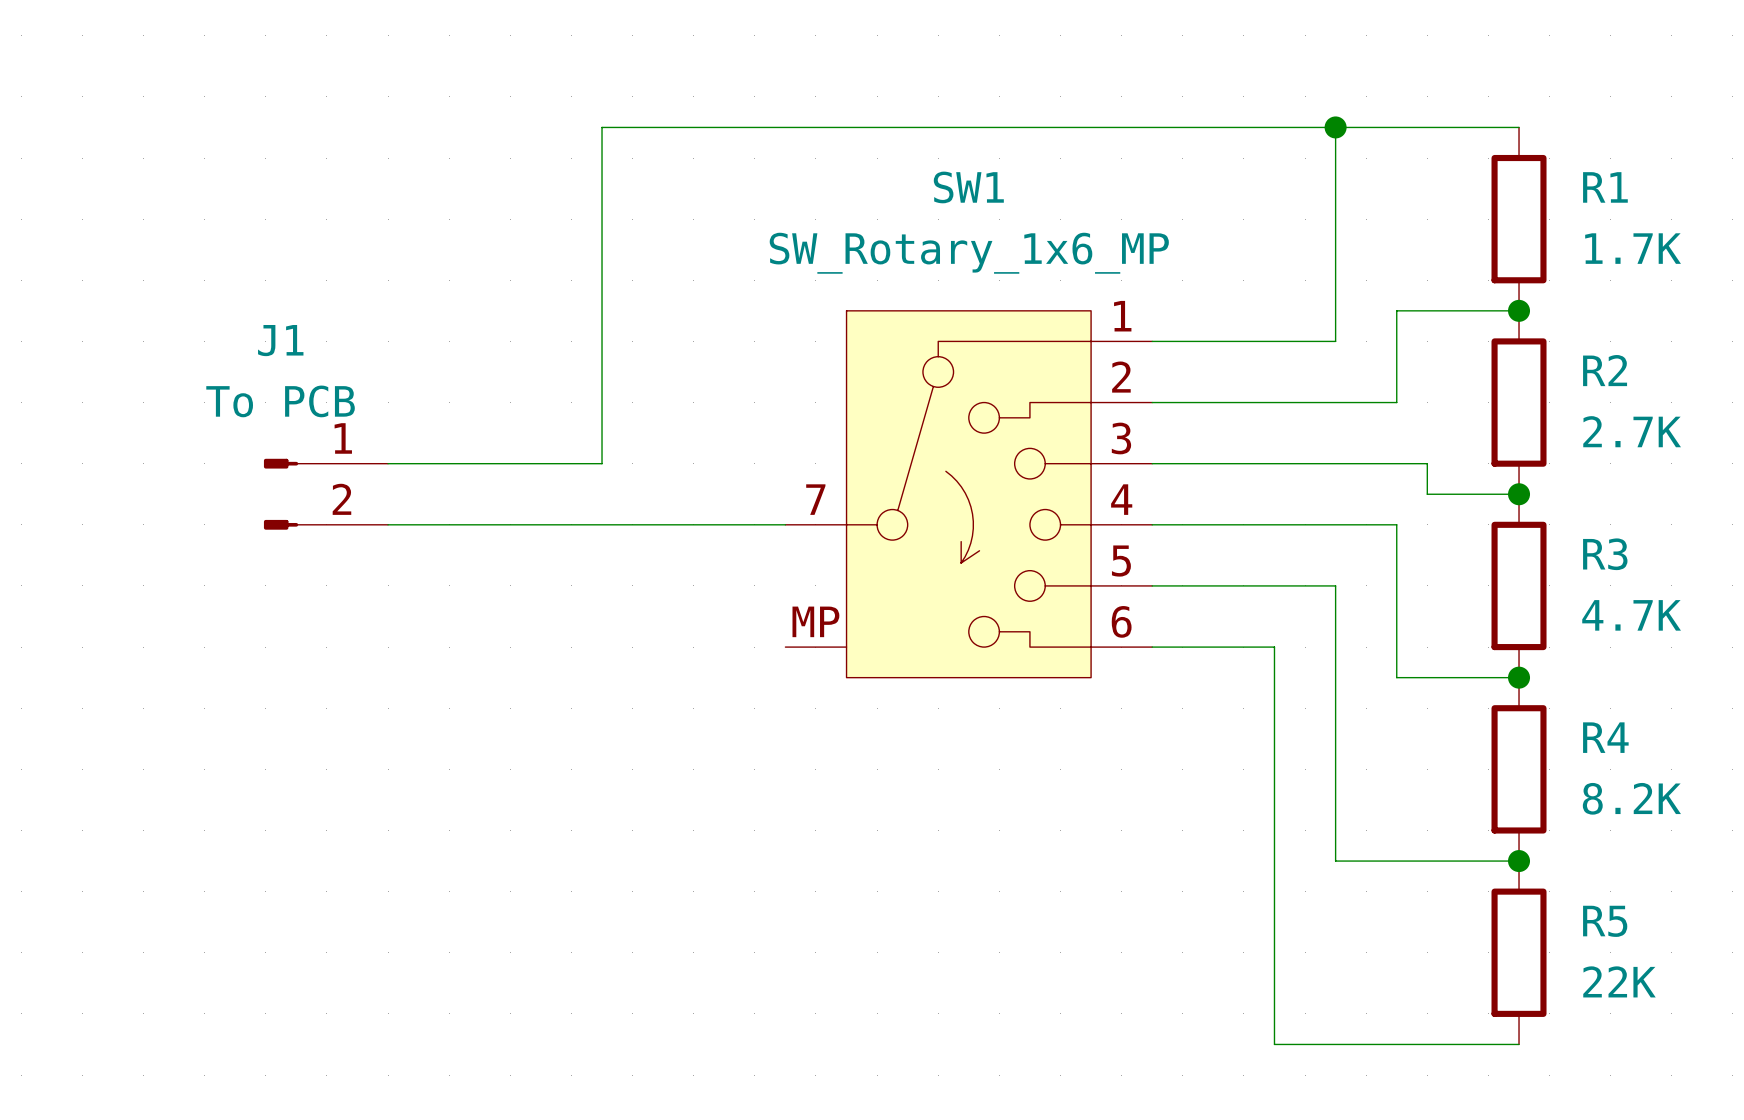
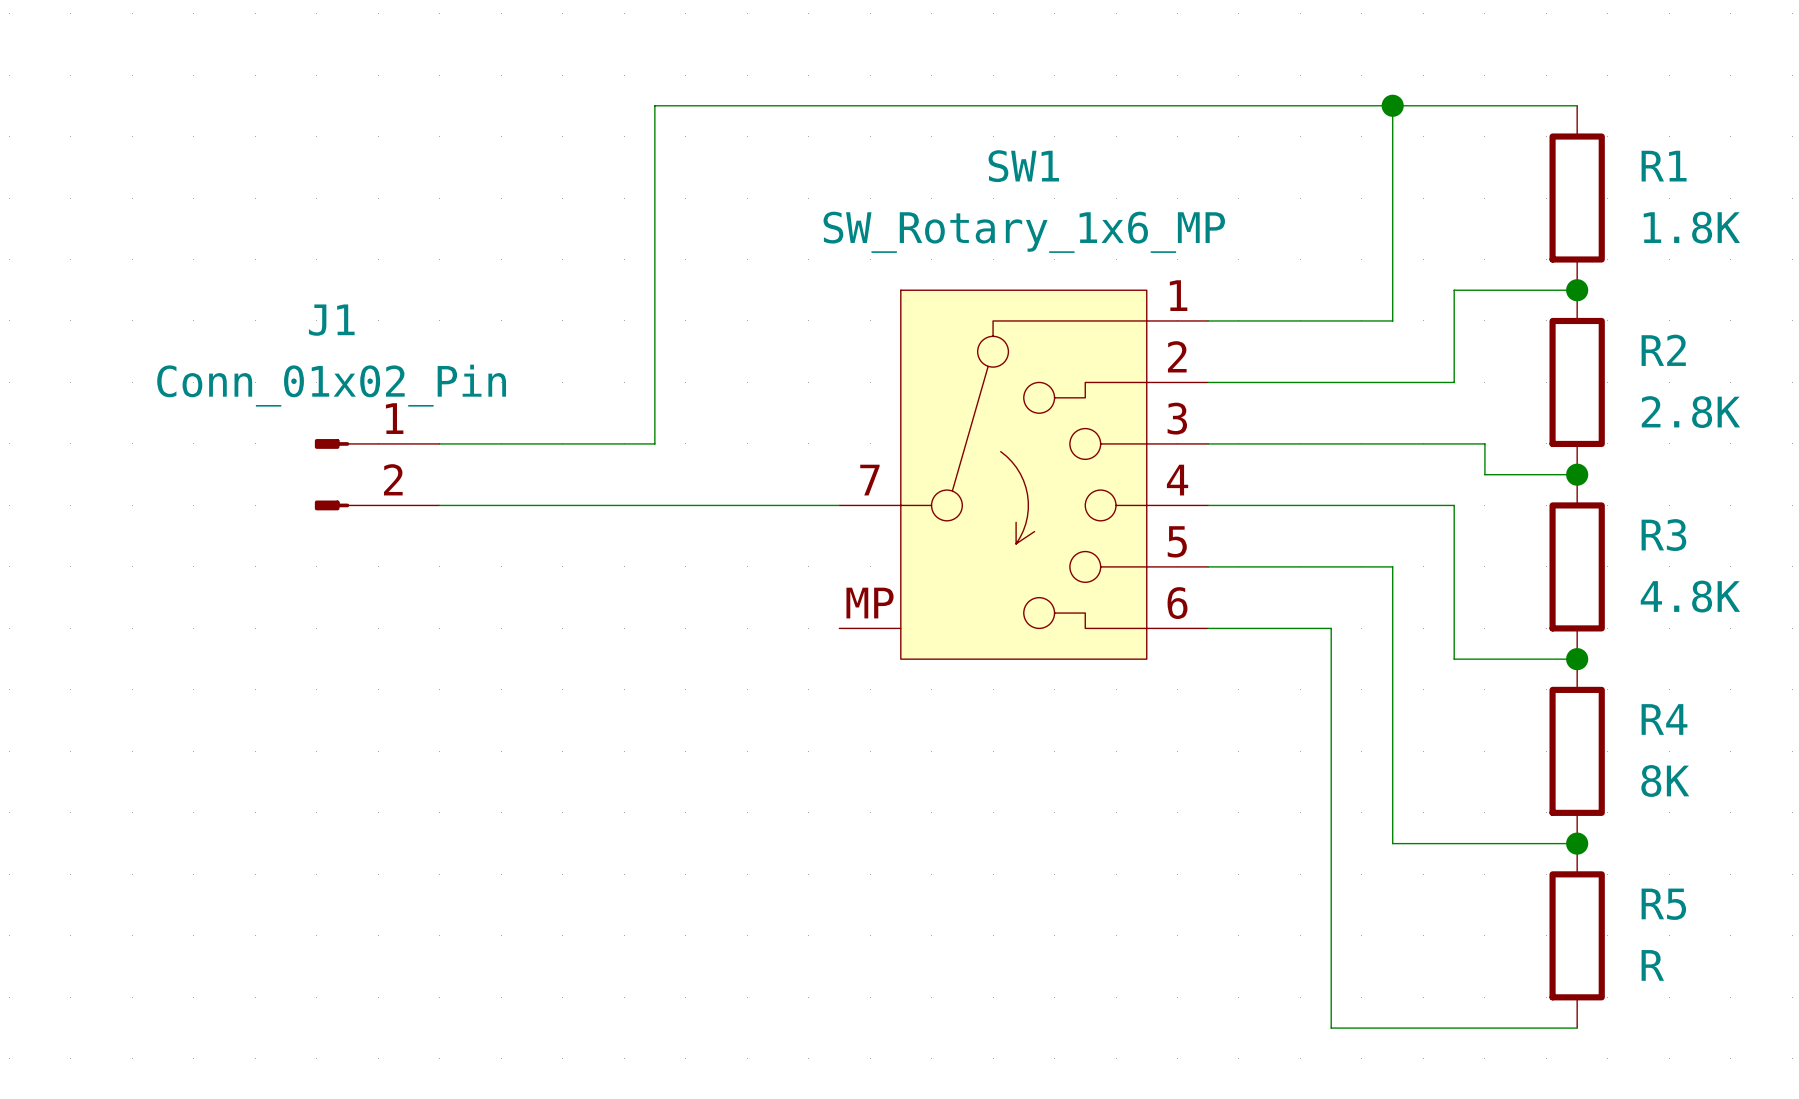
R1 value: 1.7K (1633, 248) -> 1.8K (1691, 227)
J1 value: To PCB (280, 401) -> Conn_01x02_Pin (331, 385)
R2 value: 2.7K (1632, 431) -> 2.8K (1690, 412)
R3 value: 4.7K (1631, 615) -> 4.8K (1690, 596)
R4 value: 8.2K (1631, 798) -> 8K (1665, 780)
R5 value: 22K (1619, 981) -> R (1652, 965)

